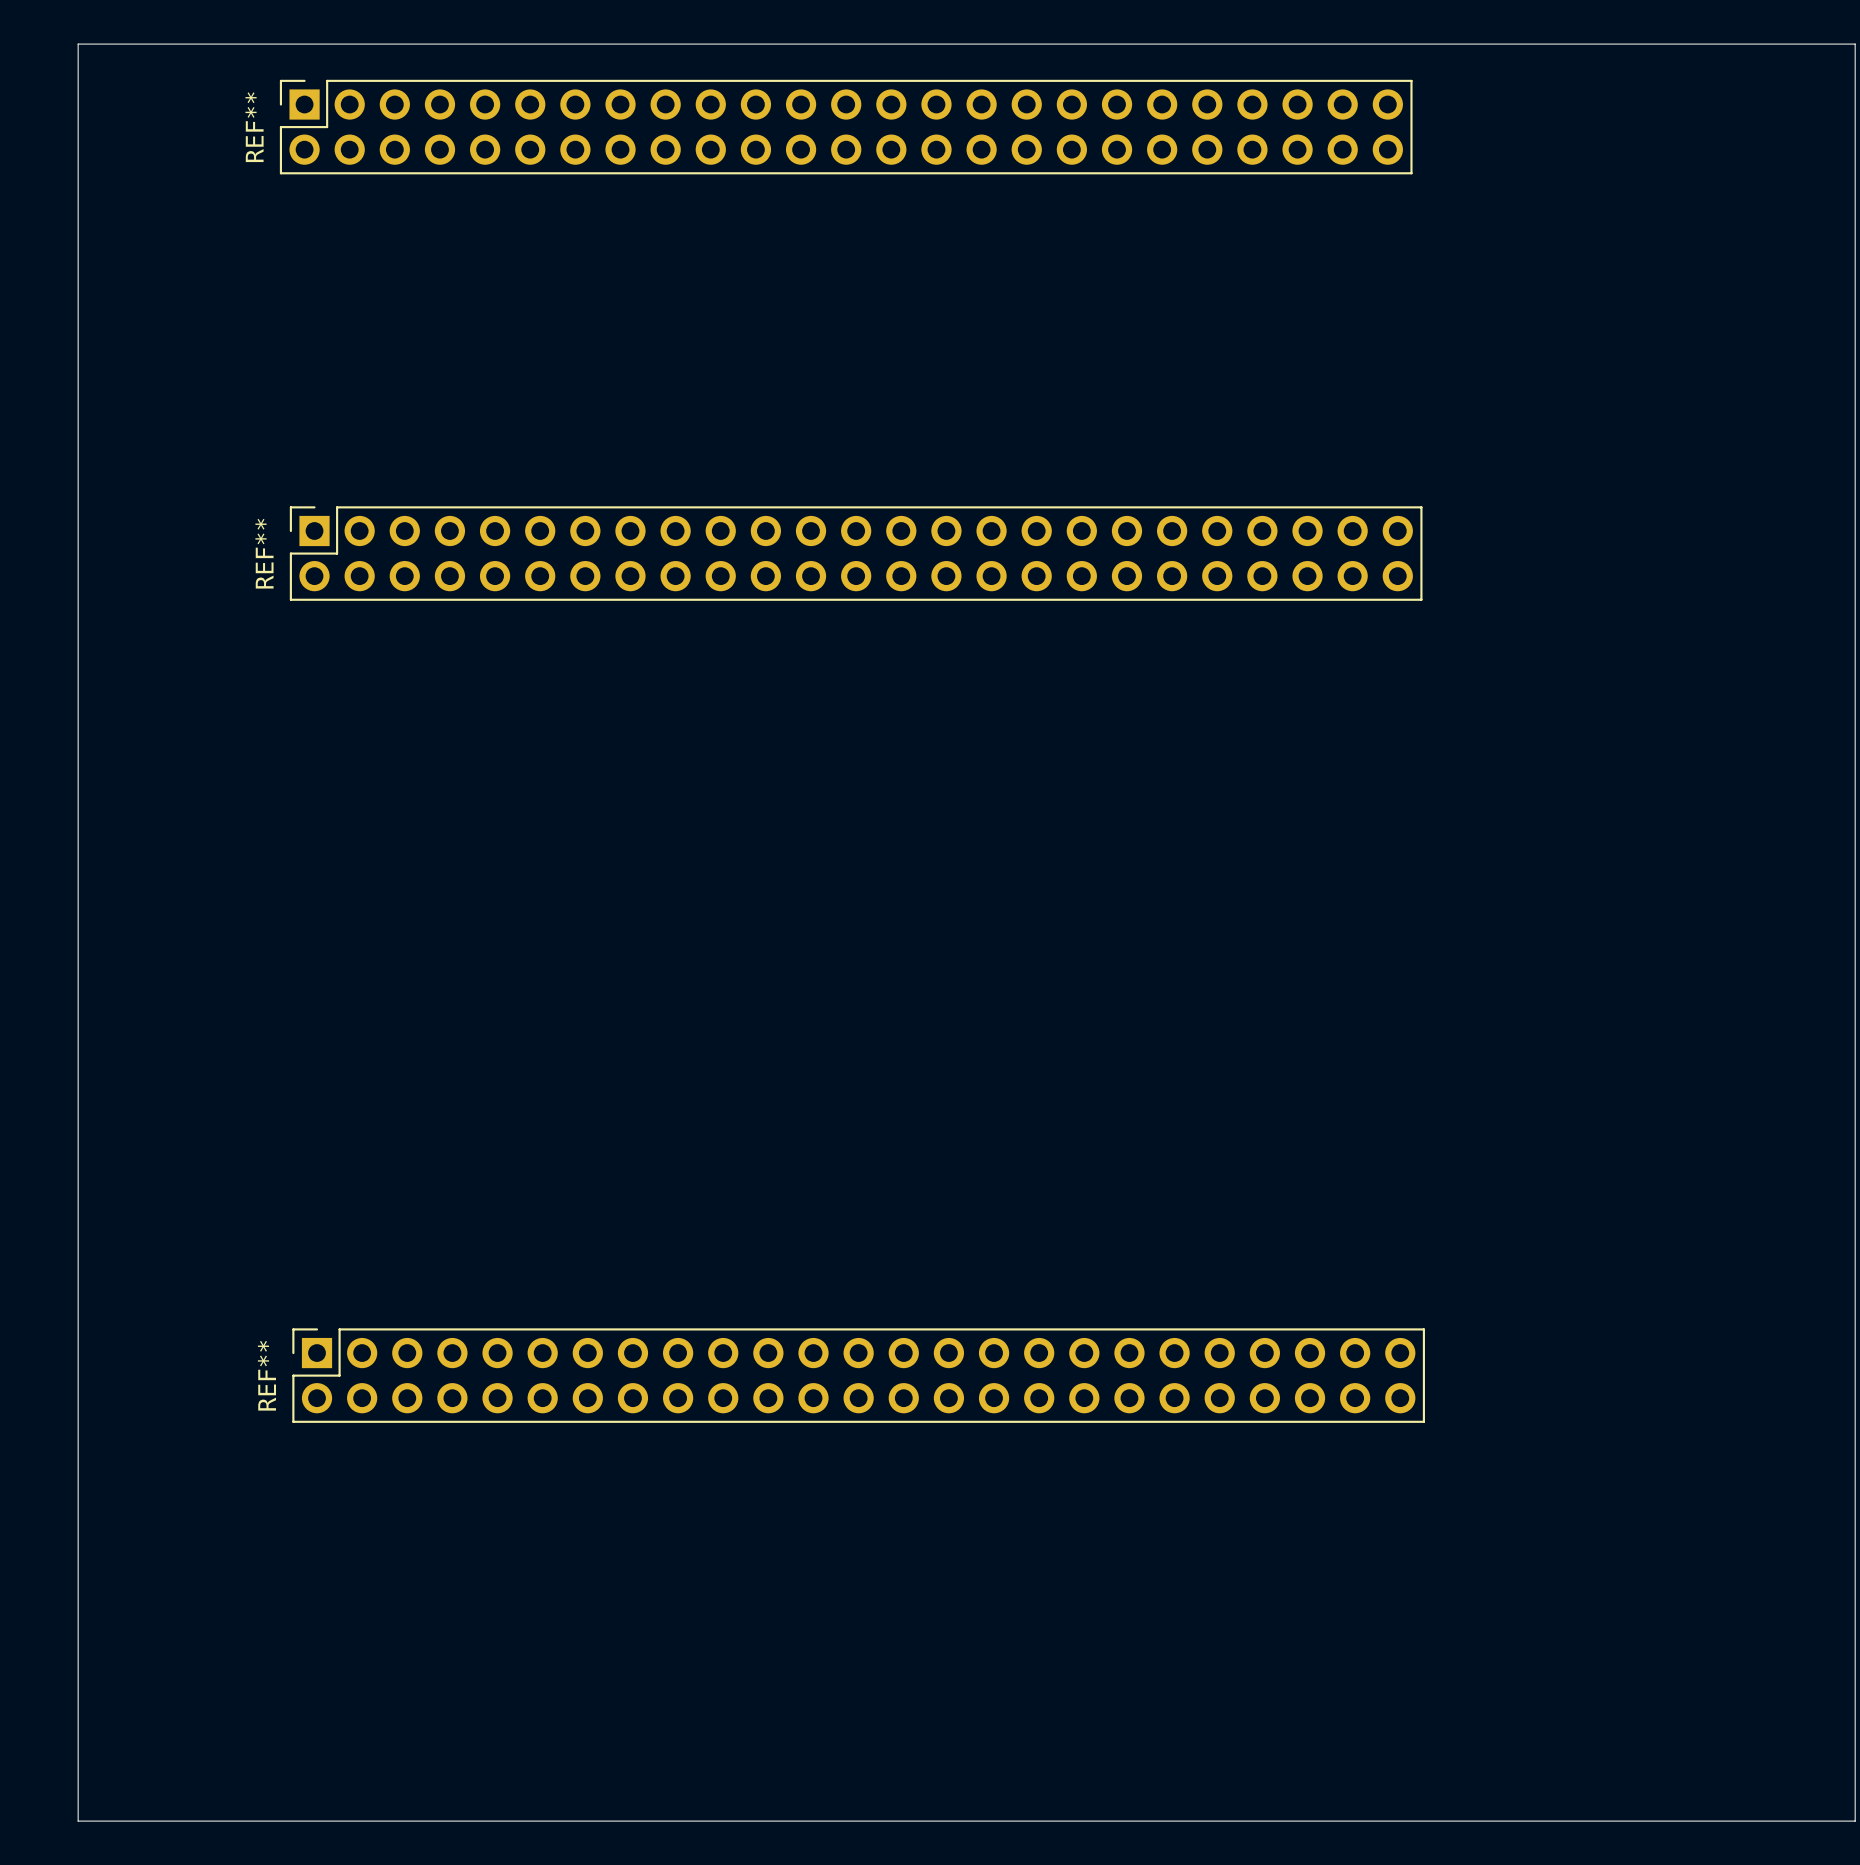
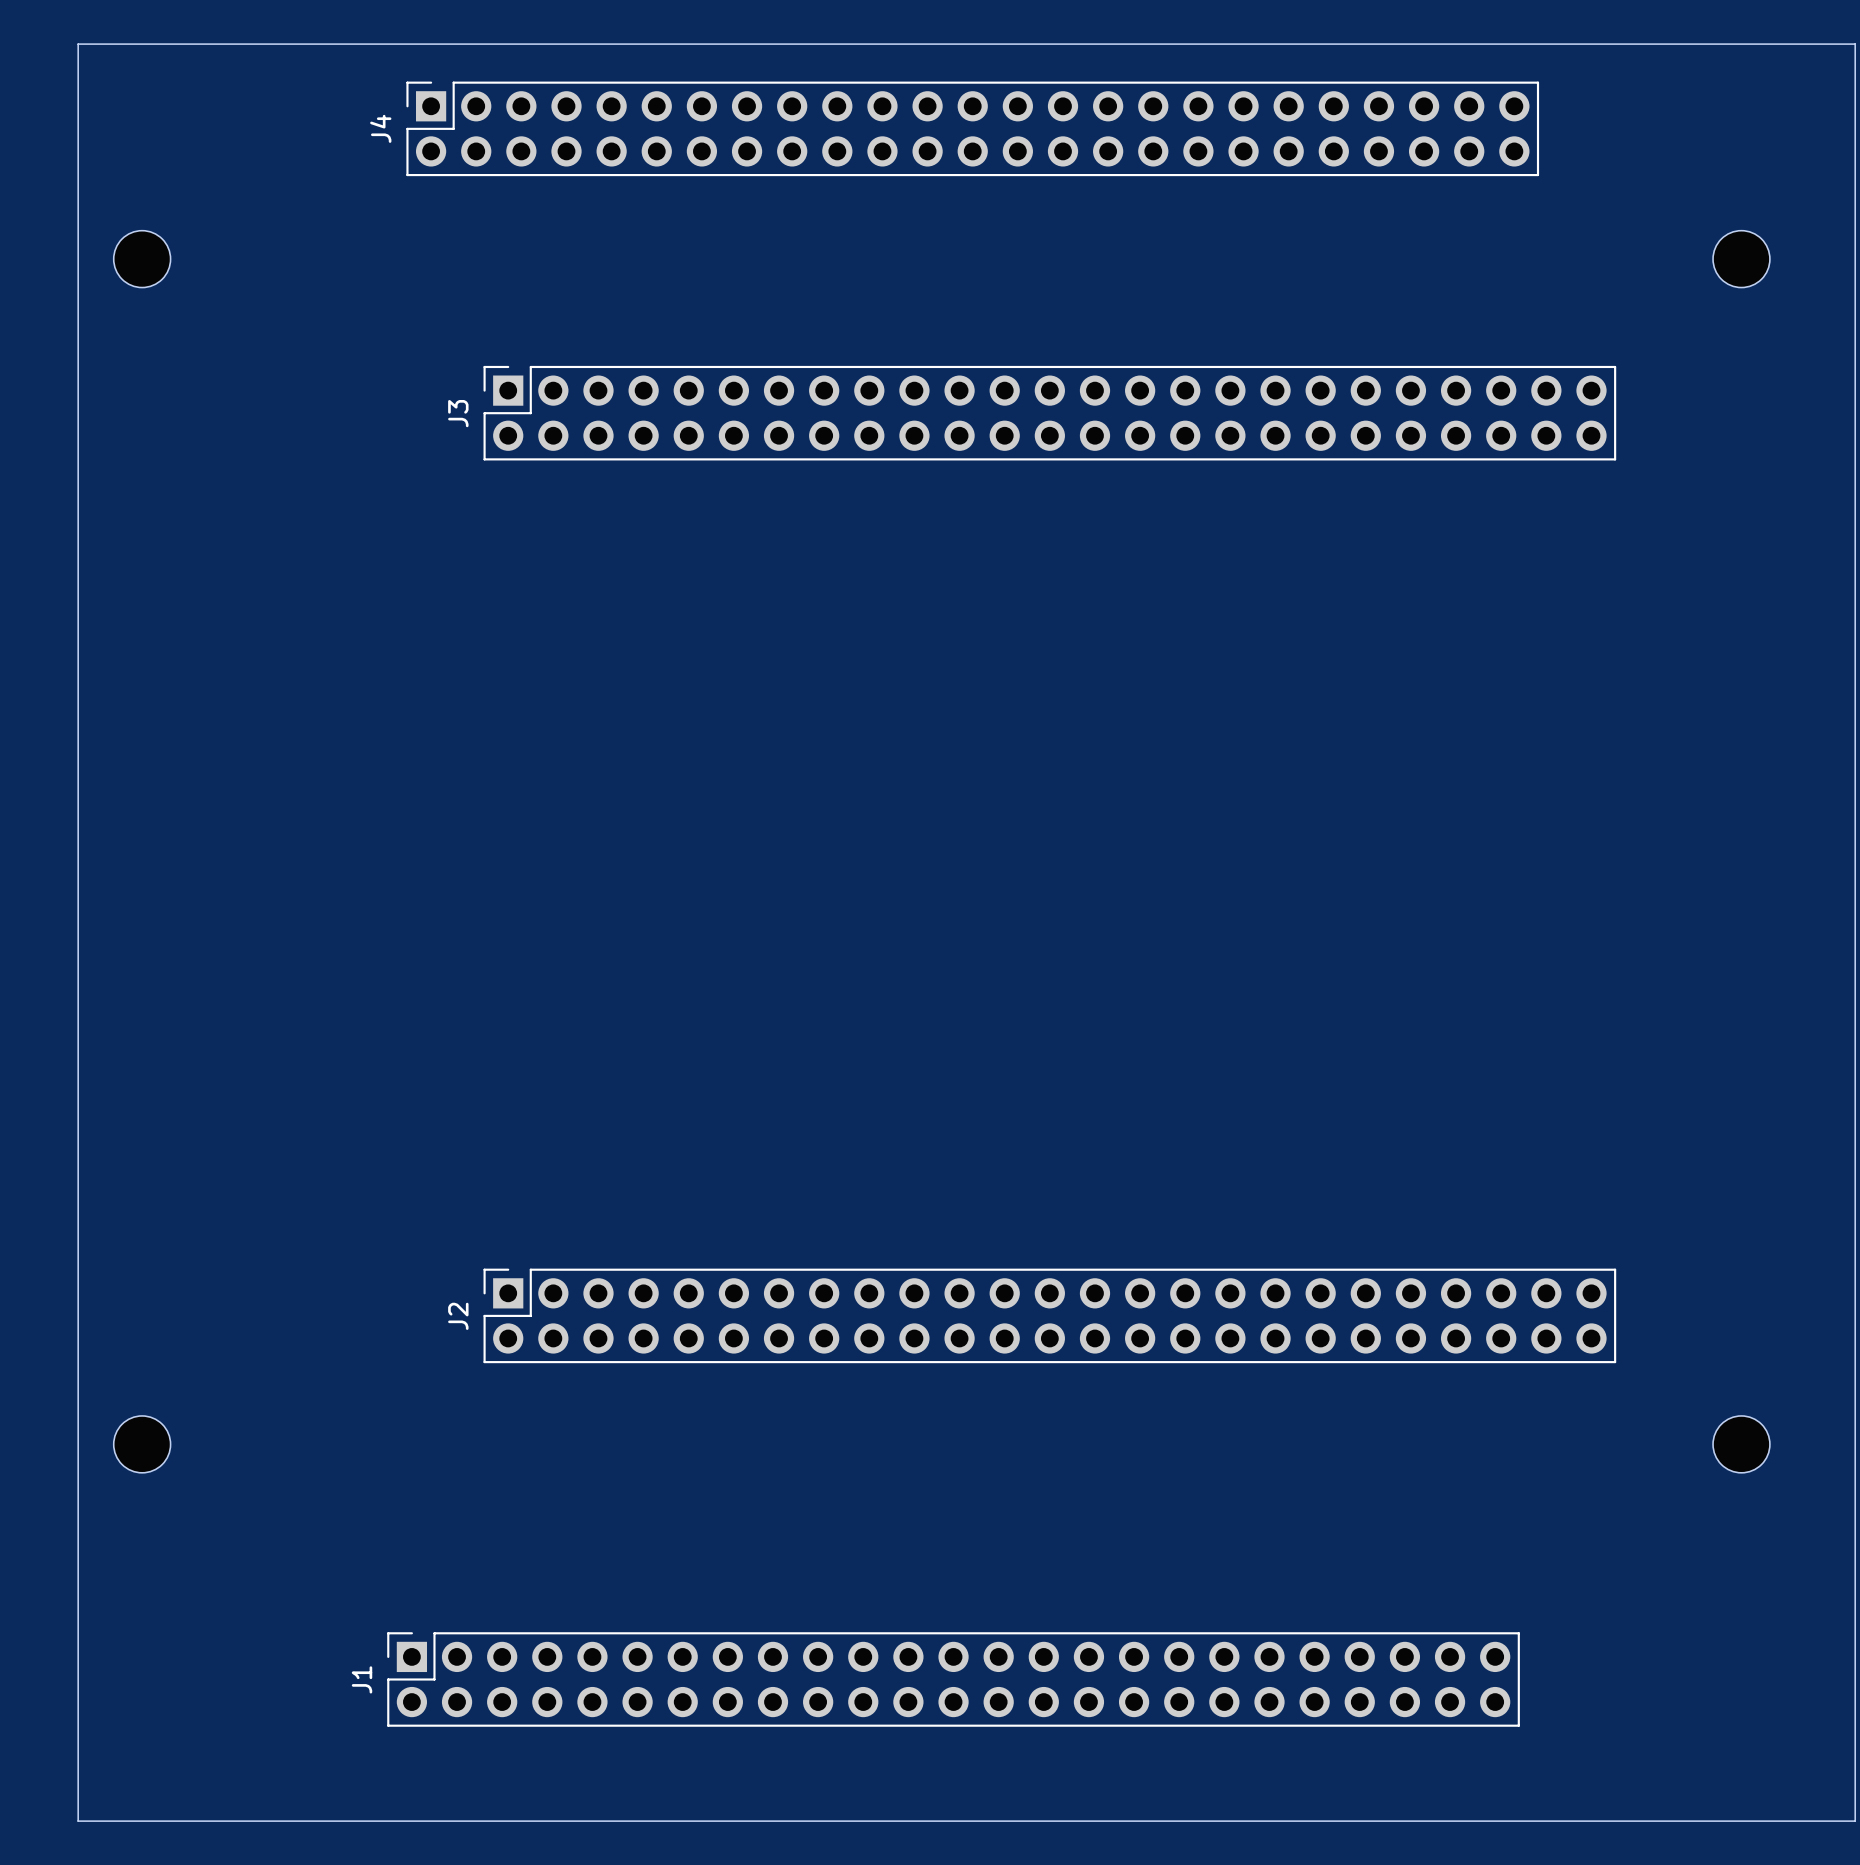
REF**: (846, 127) -> none
J4: none -> (972, 128)
part: none -> (142, 259)
part: none -> (1741, 259)
J3: none -> (1049, 413)
REF**: (856, 553) -> none
J2: none -> (1049, 1315)
REF**: (858, 1375) -> none
part: none -> (142, 1444)
part: none -> (1741, 1444)
J1: none -> (953, 1679)

